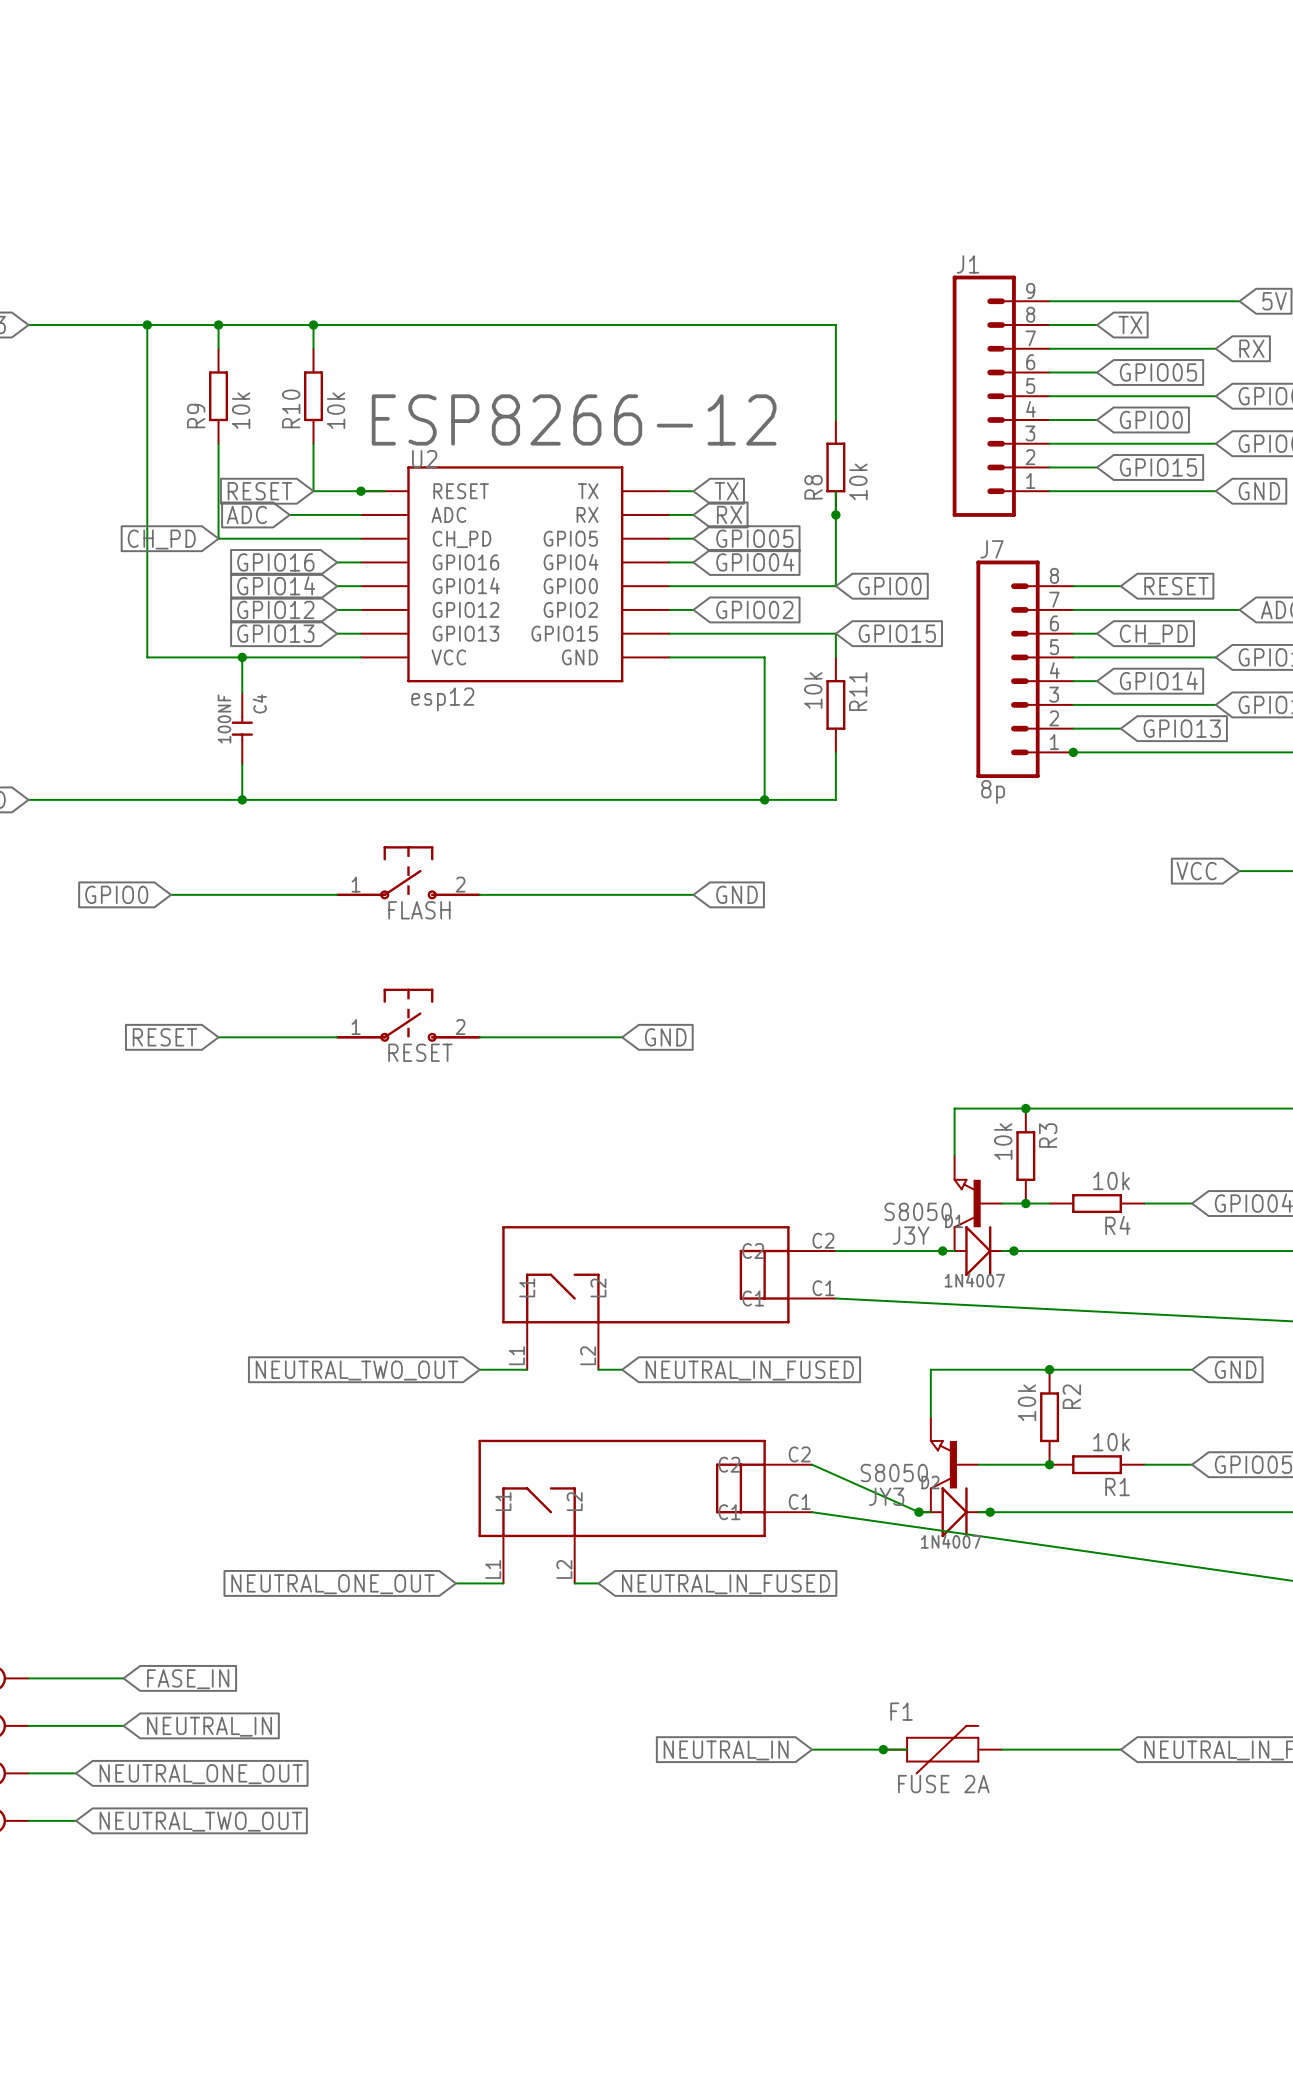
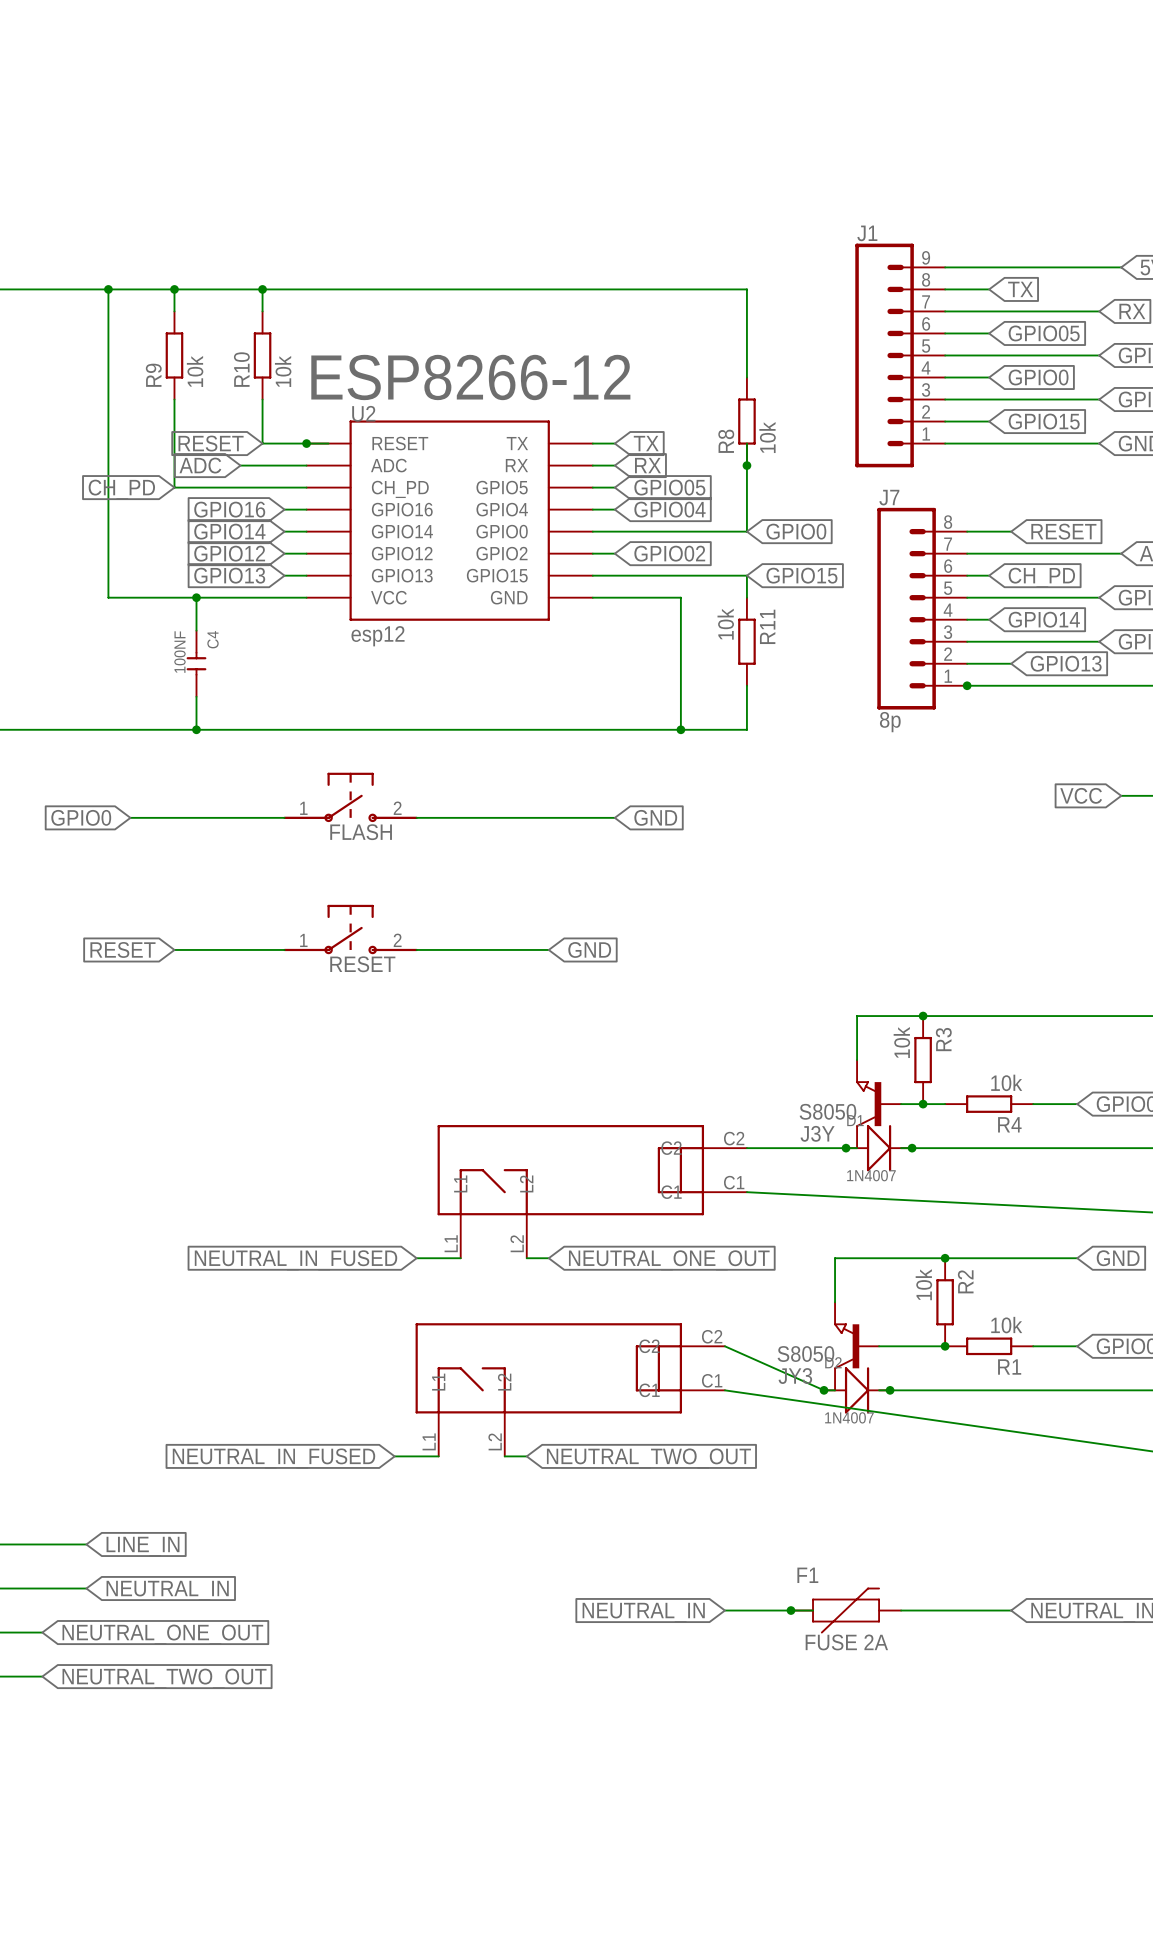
global label: NEUTRAL_TWO_OUT (357, 1370) -> NEUTRAL_IN_FUSED (296, 1260)
global label: NEUTRAL_IN_FUSED (749, 1370) -> NEUTRAL_ONE_OUT (669, 1260)
global label: NEUTRAL_ONE_OUT (332, 1584) -> NEUTRAL_IN_FUSED (273, 1458)
global label: NEUTRAL_IN_FUSED (726, 1584) -> NEUTRAL_TWO_OUT (648, 1458)
global label: FASE_IN (188, 1679) -> LINE_IN (143, 1546)

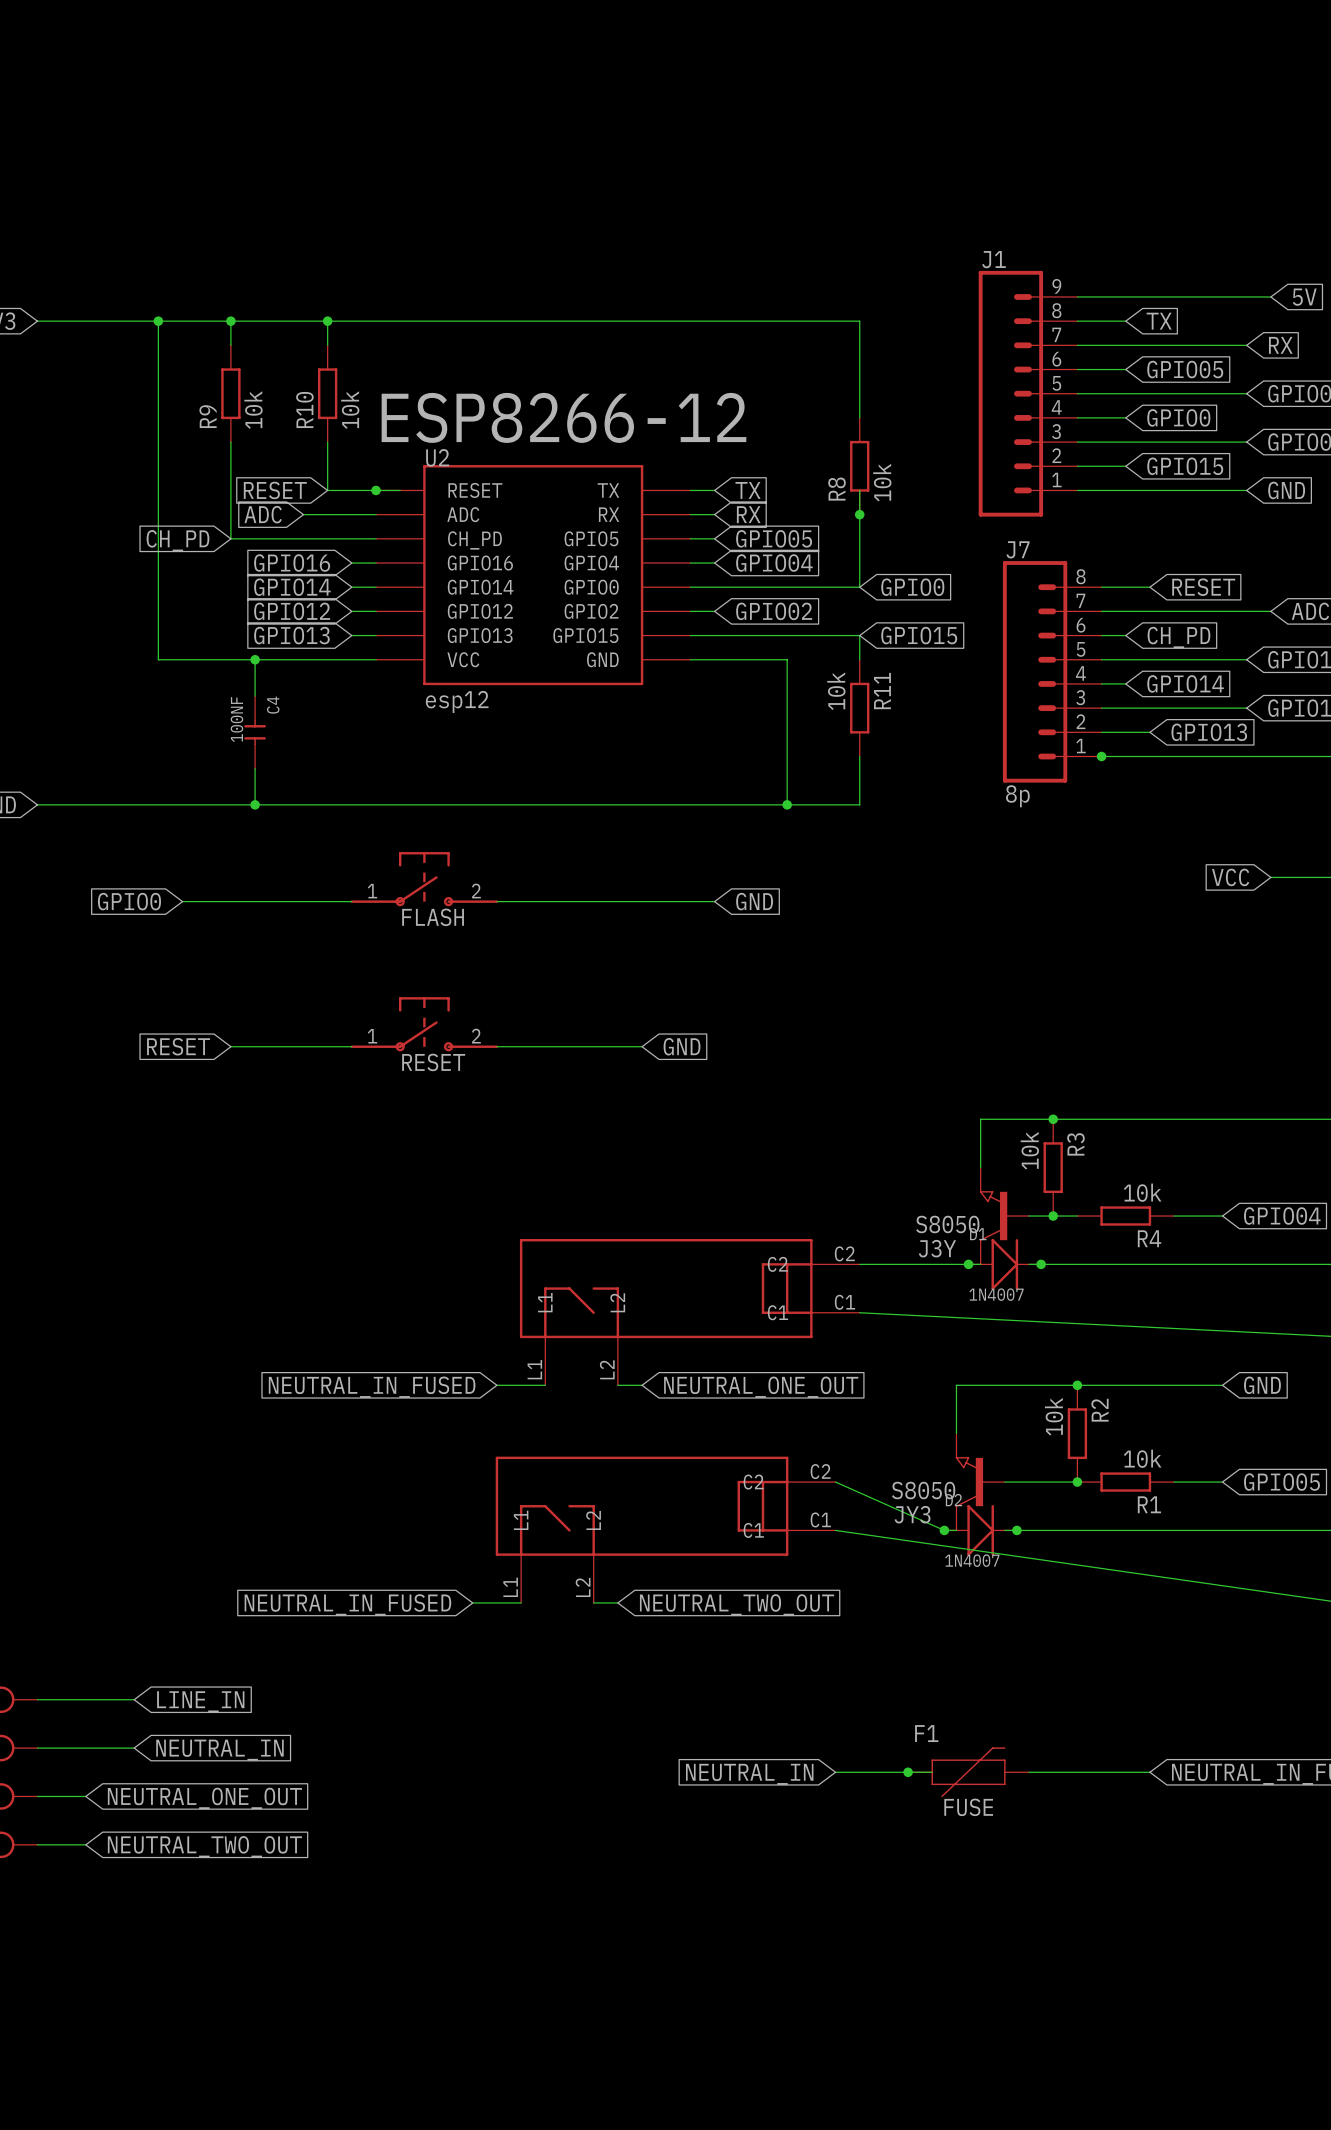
F1 value: FUSE 2A (846, 1642) -> FUSE (968, 1807)

